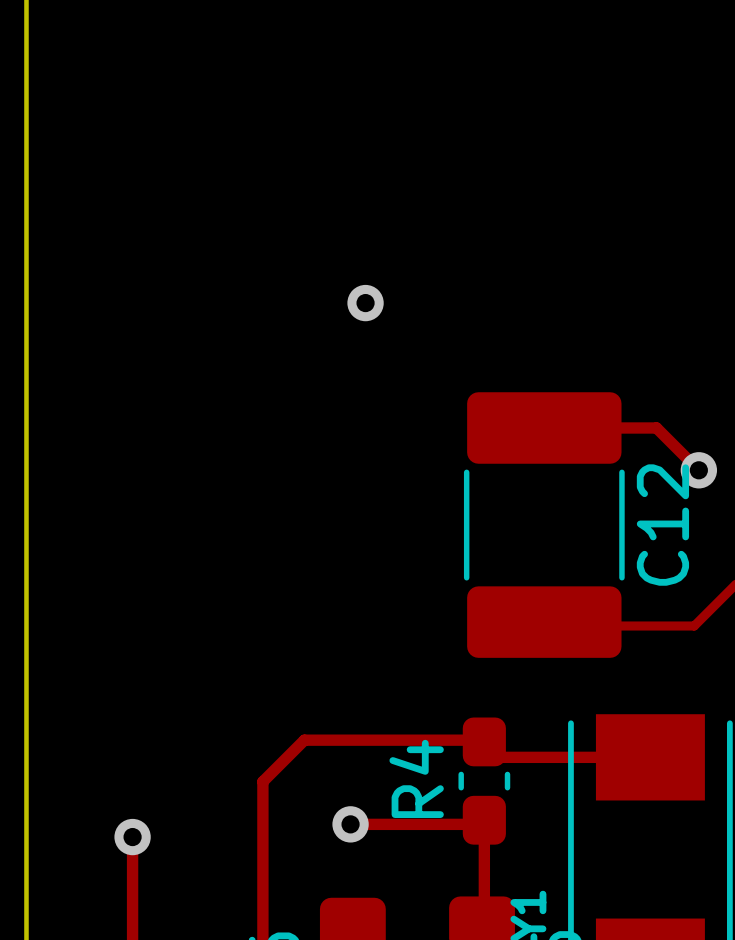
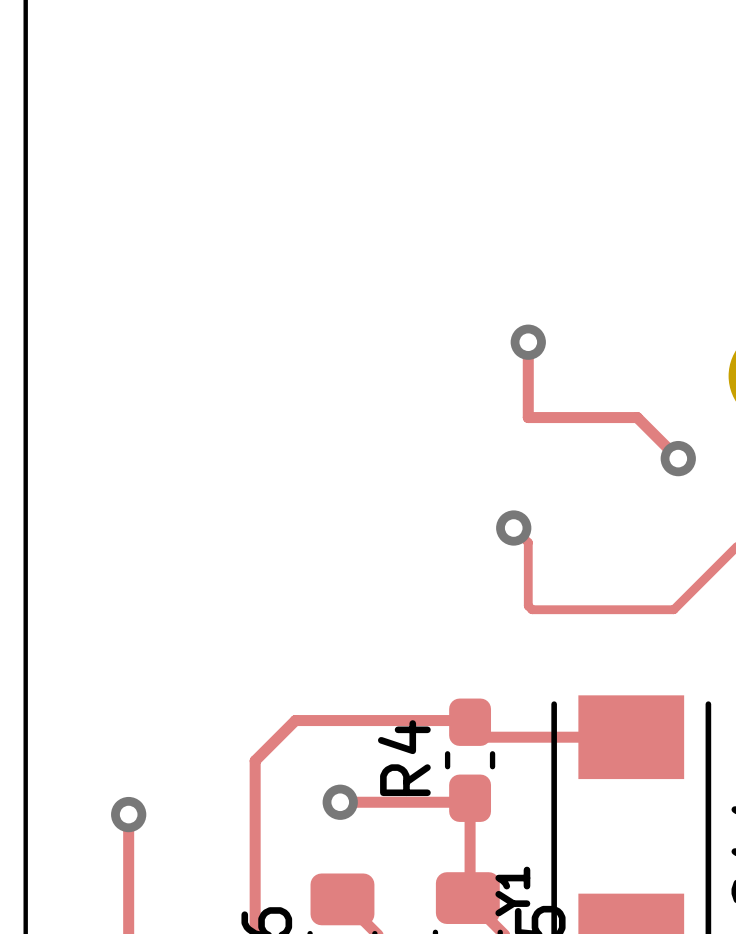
via: (365, 303) -> none
track: none -> (528, 342) (528, 417)
via: none -> (528, 342)
C12: (544, 525) -> none
track: none -> (513, 528) (528, 542) (528, 605)
via: none -> (513, 528)

